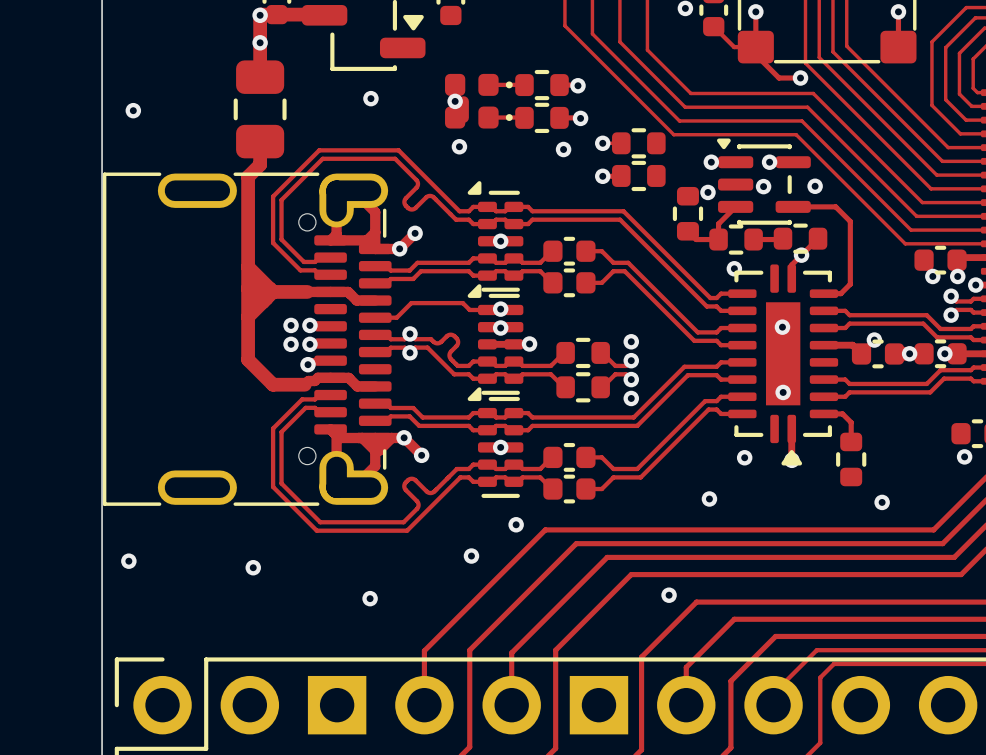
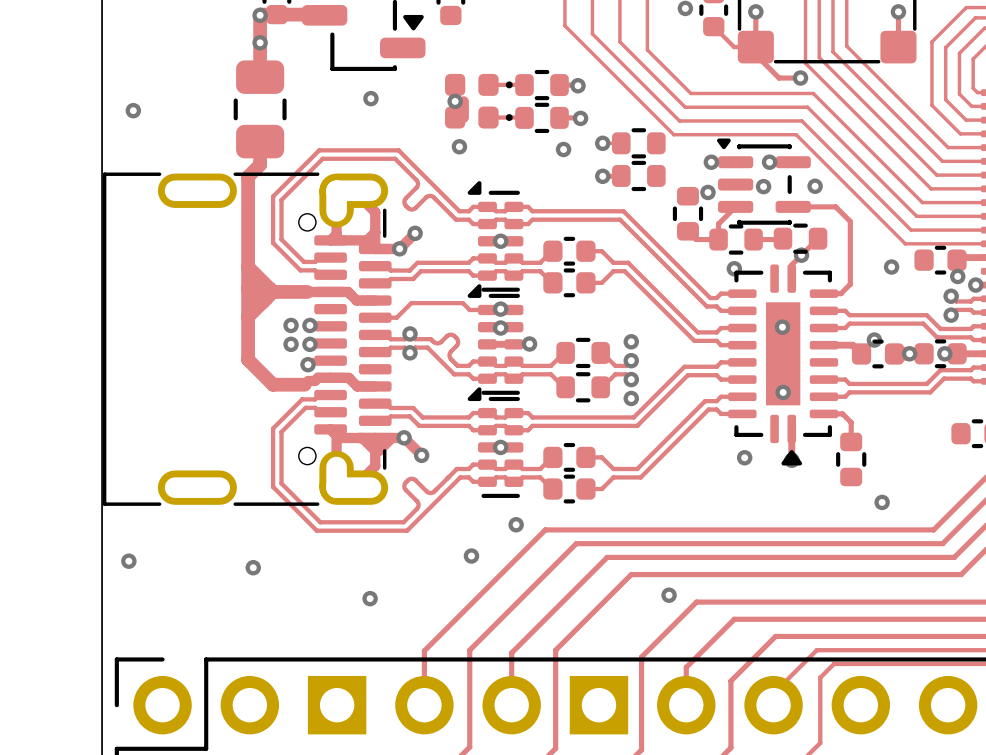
via position: (932, 276) -> (891, 267)
via: (964, 456) -> none
via: (709, 498) -> none

